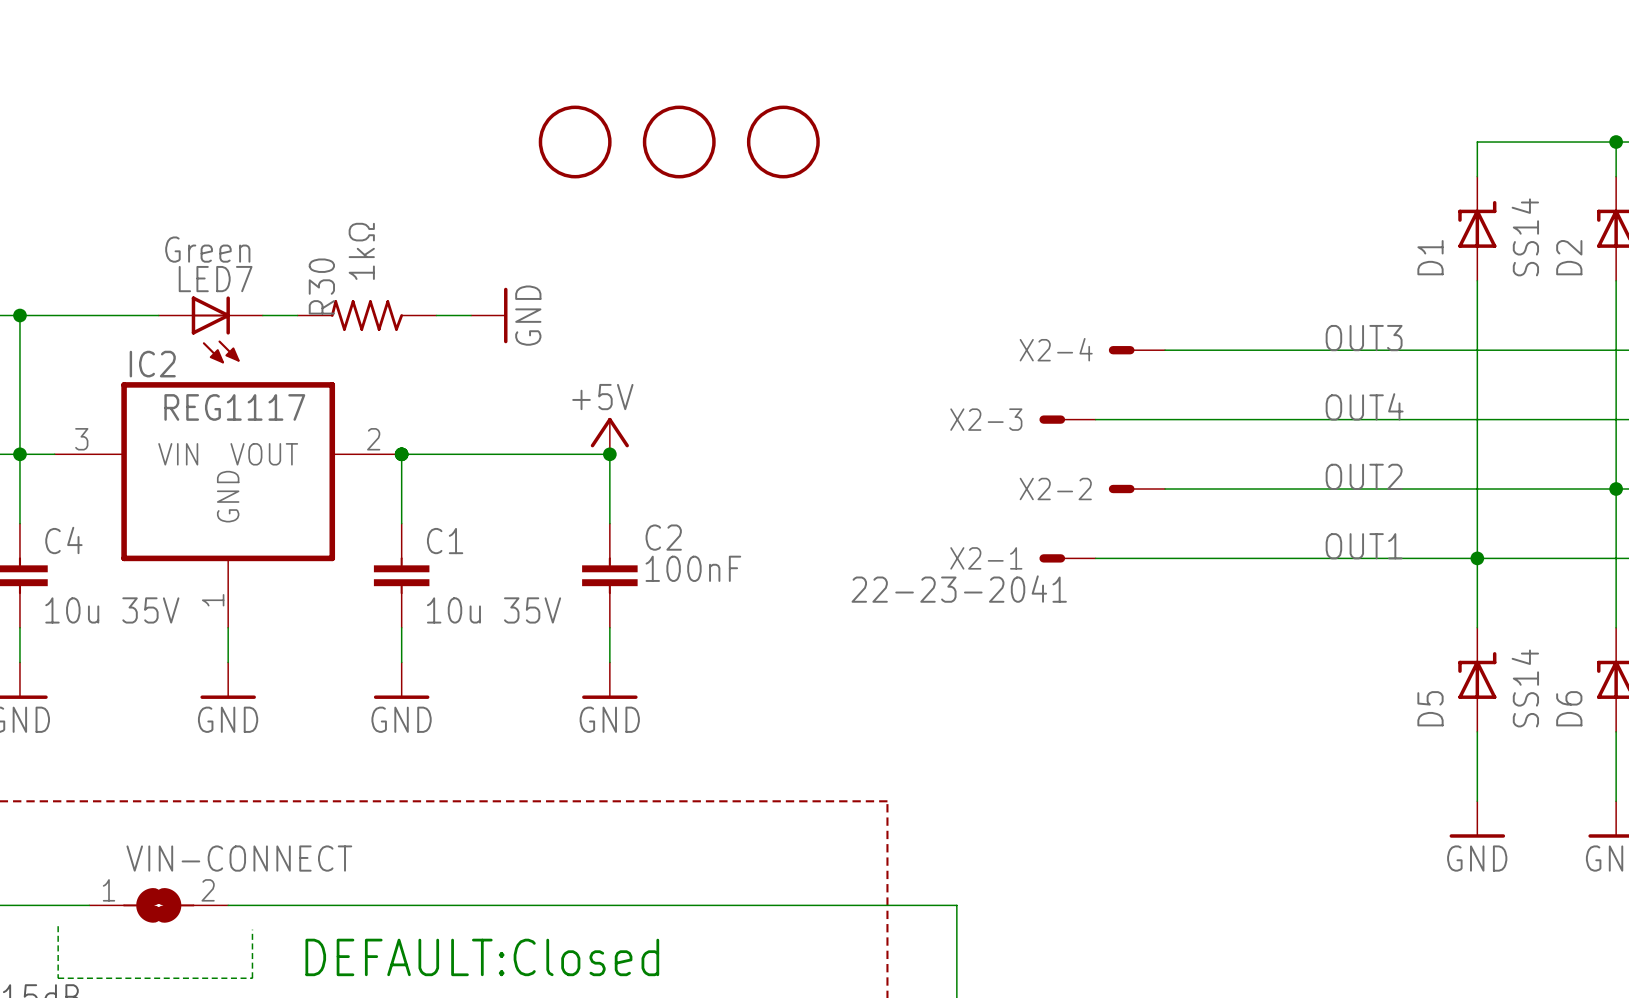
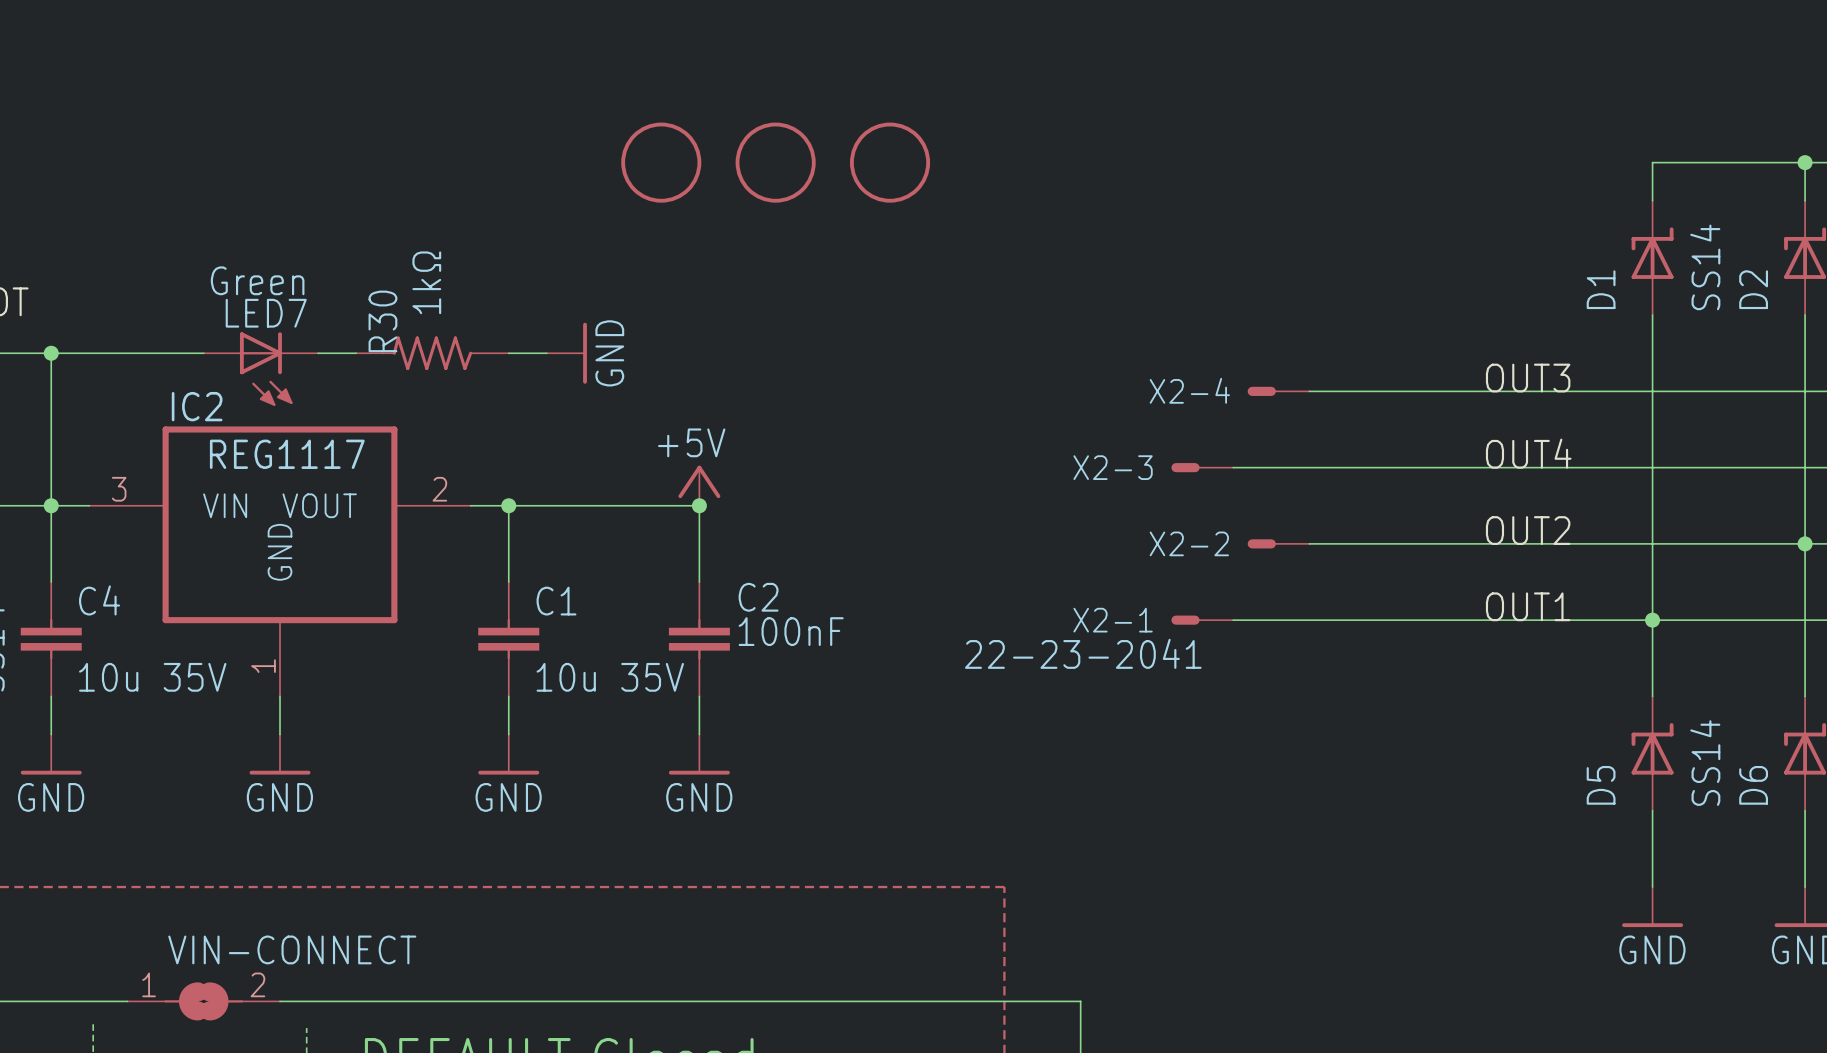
wire: (401, 454) (401, 523) -> (508, 505) (508, 582)
junction position: (401, 454) -> (508, 505)
C1 position: (401, 575) -> (508, 639)
wire: (401, 627) (401, 662) -> (508, 696) (508, 734)
power symbol position: GND (401, 680) -> GND (508, 754)

